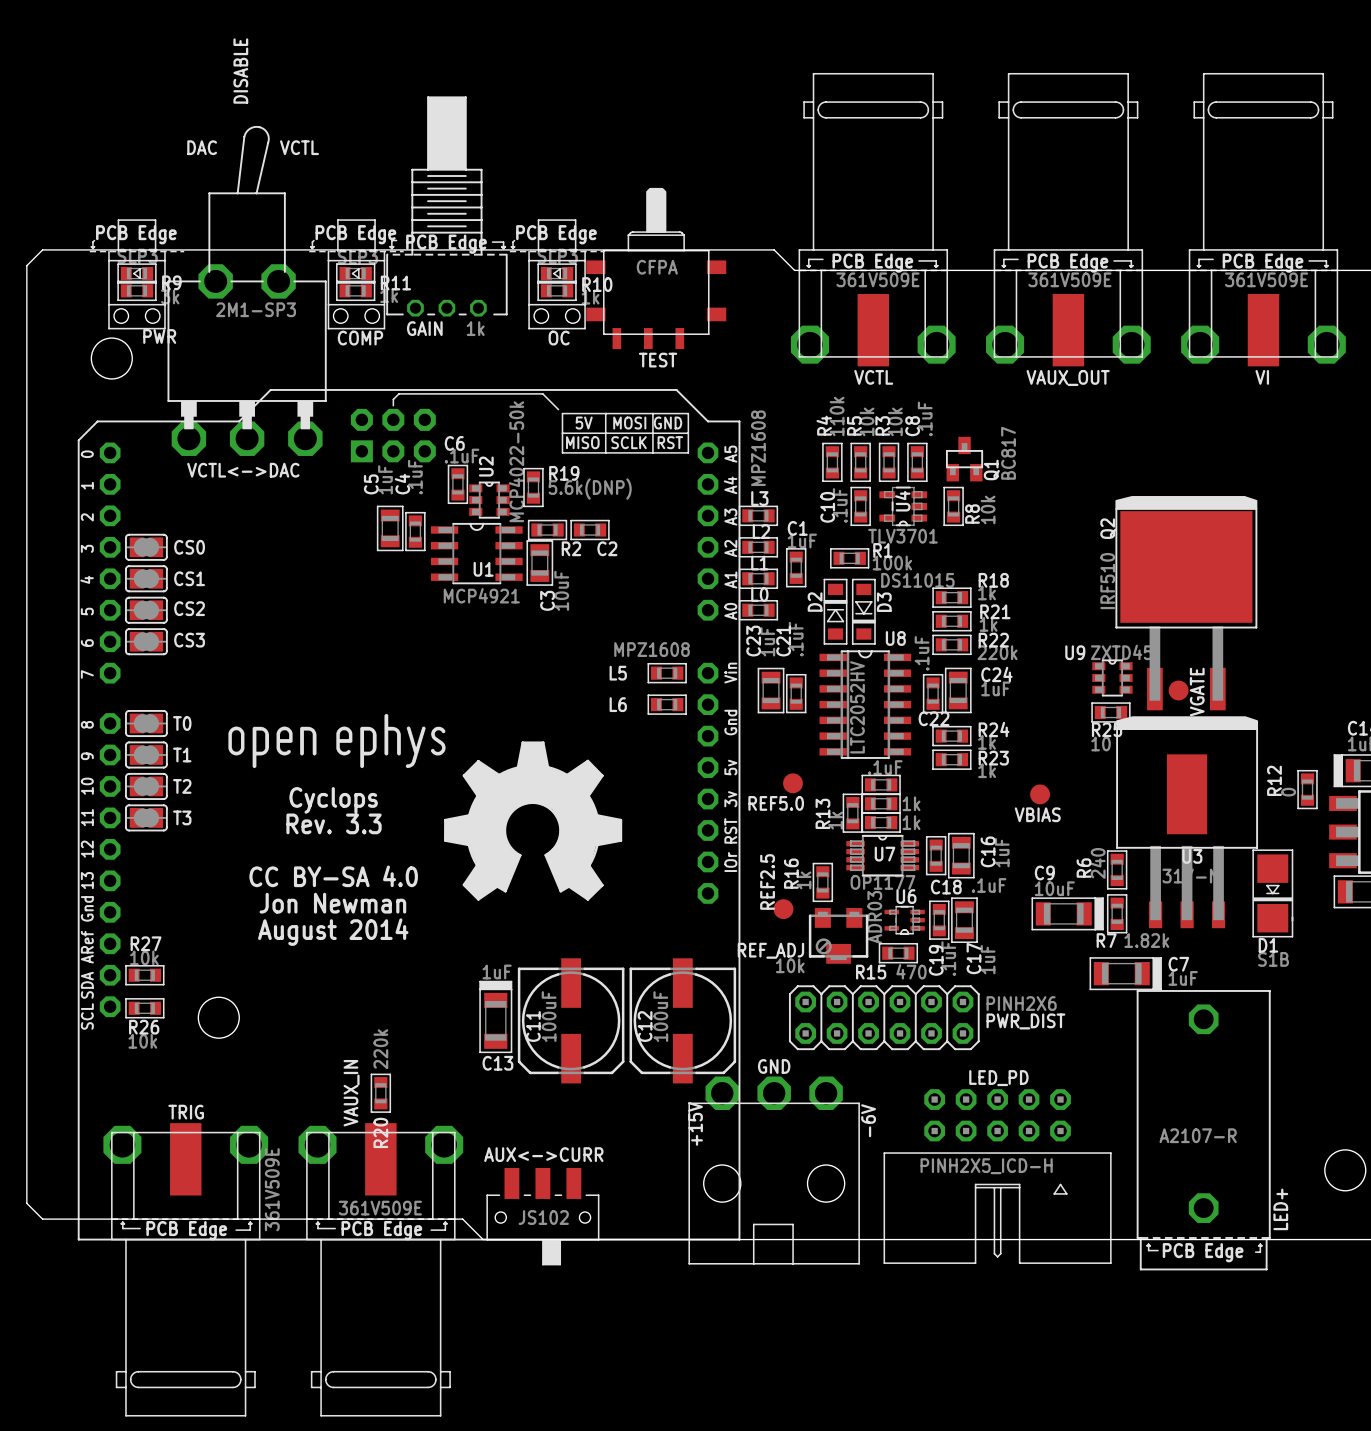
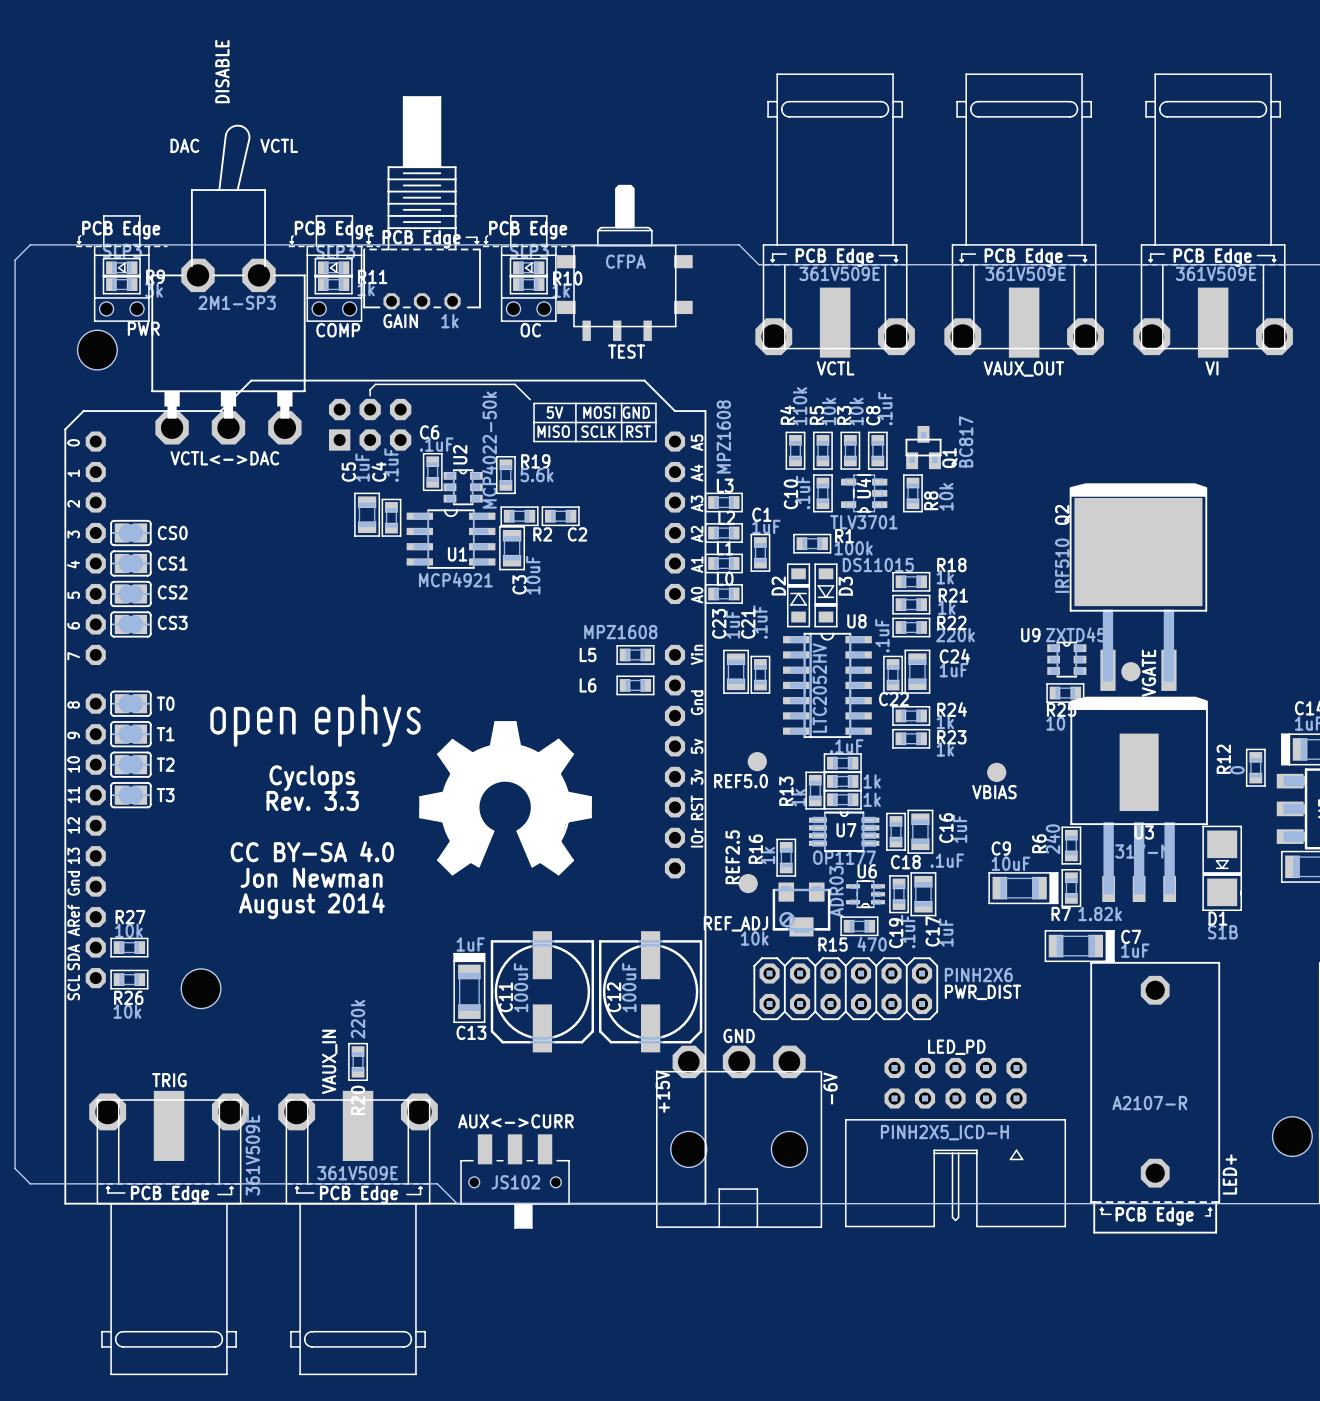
R19 value: 5.6k(DNP) (590, 489) -> 5.6k (537, 475)

